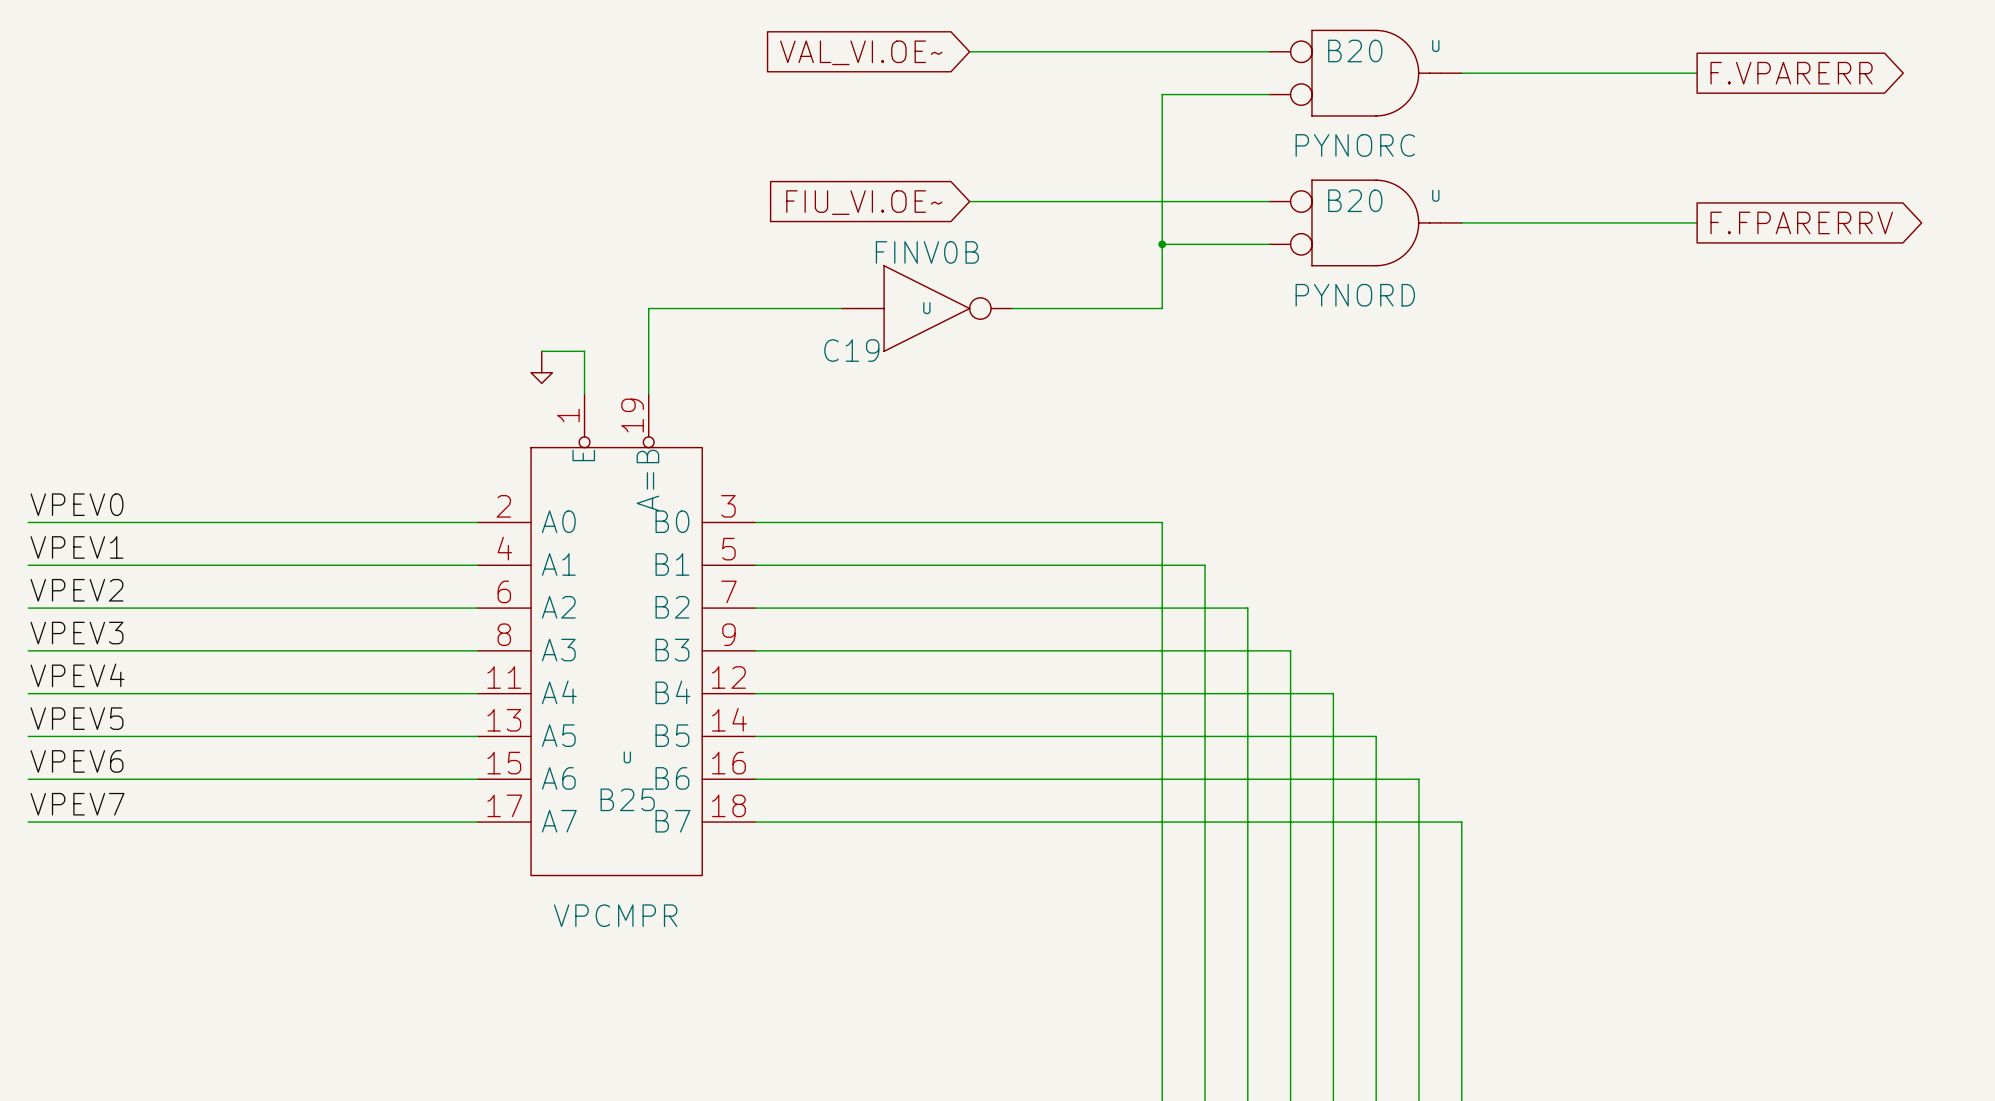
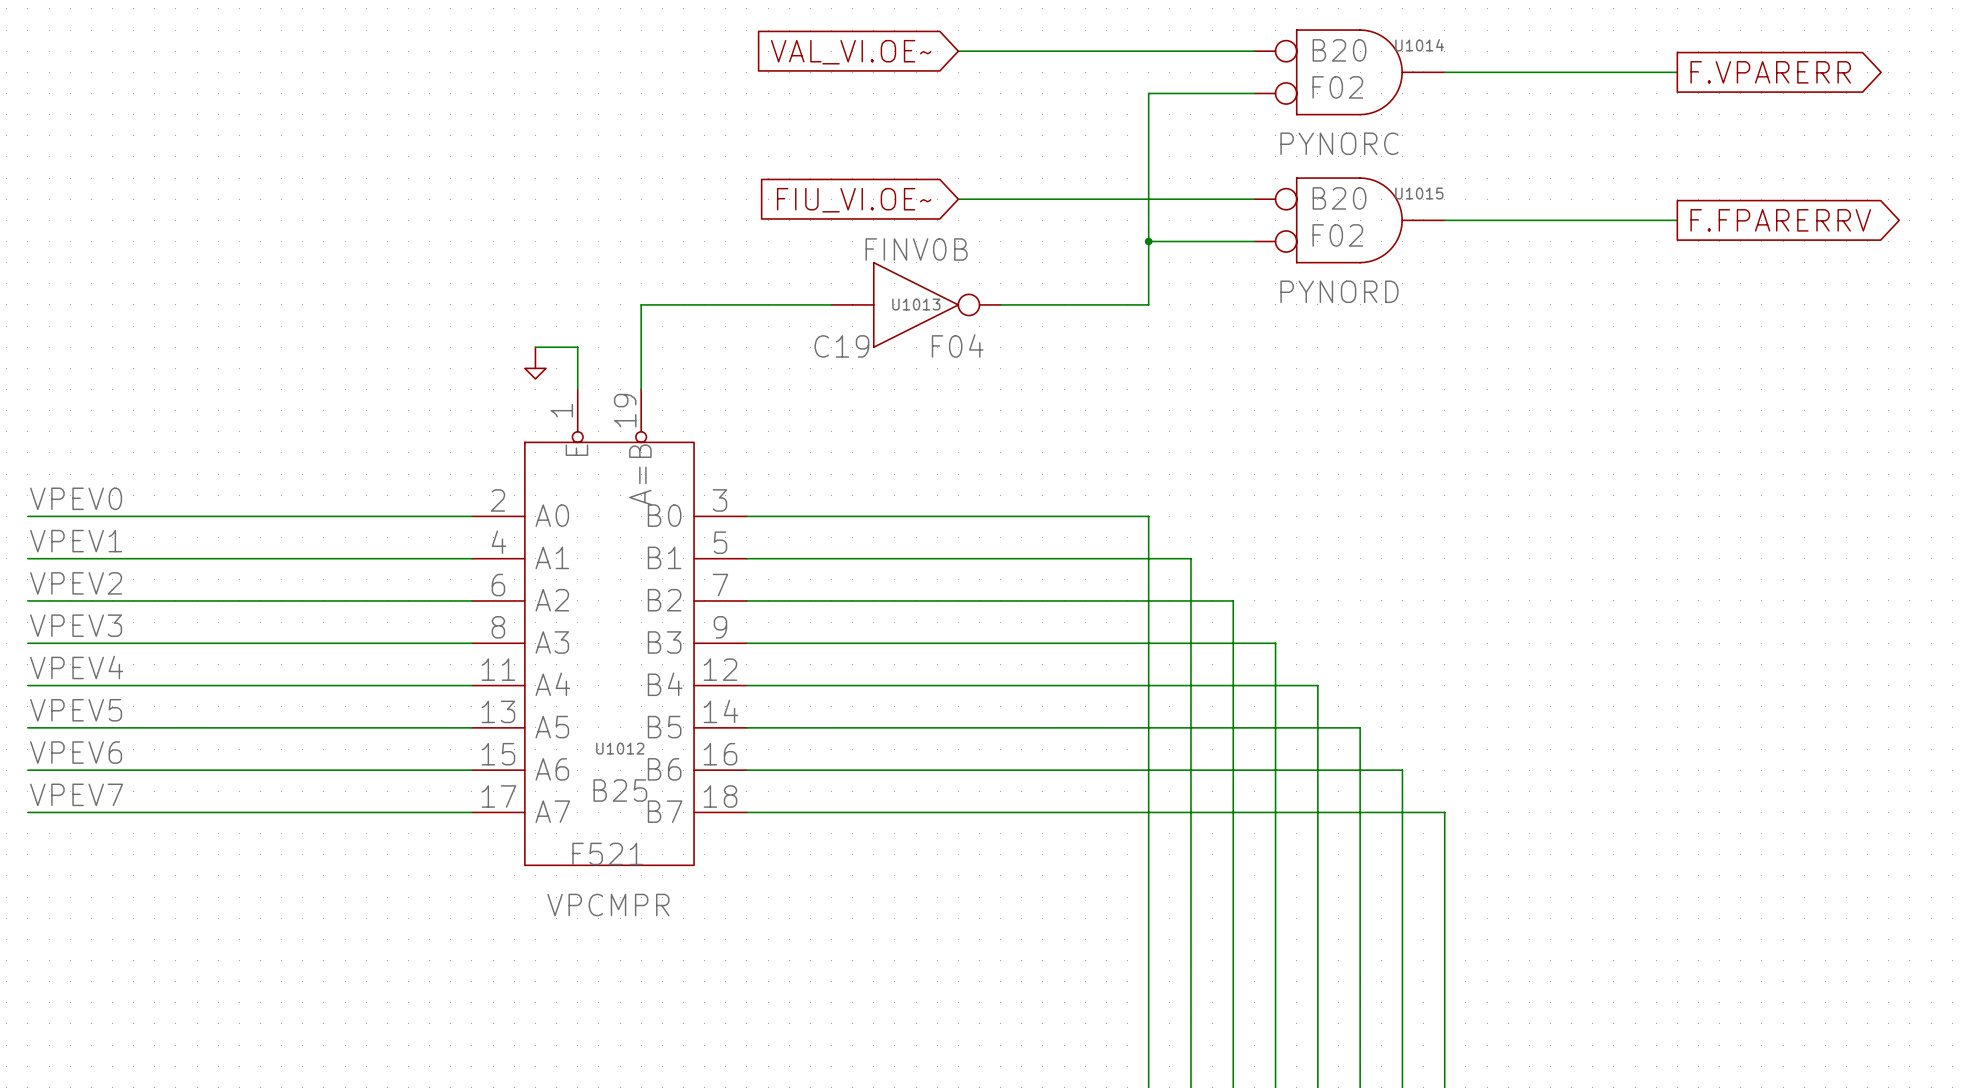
U name: U (1435, 46) -> U1014 (1419, 45)
U value: none -> F02 (1337, 87)
U name: U (1435, 195) -> U1015 (1419, 193)
U value: none -> F02 (1337, 235)
U name: U (926, 308) -> U1013 (916, 304)
U value: none -> F04 (957, 345)
U name: U (627, 757) -> U1012 (620, 748)
U value: none -> F521 (607, 853)

